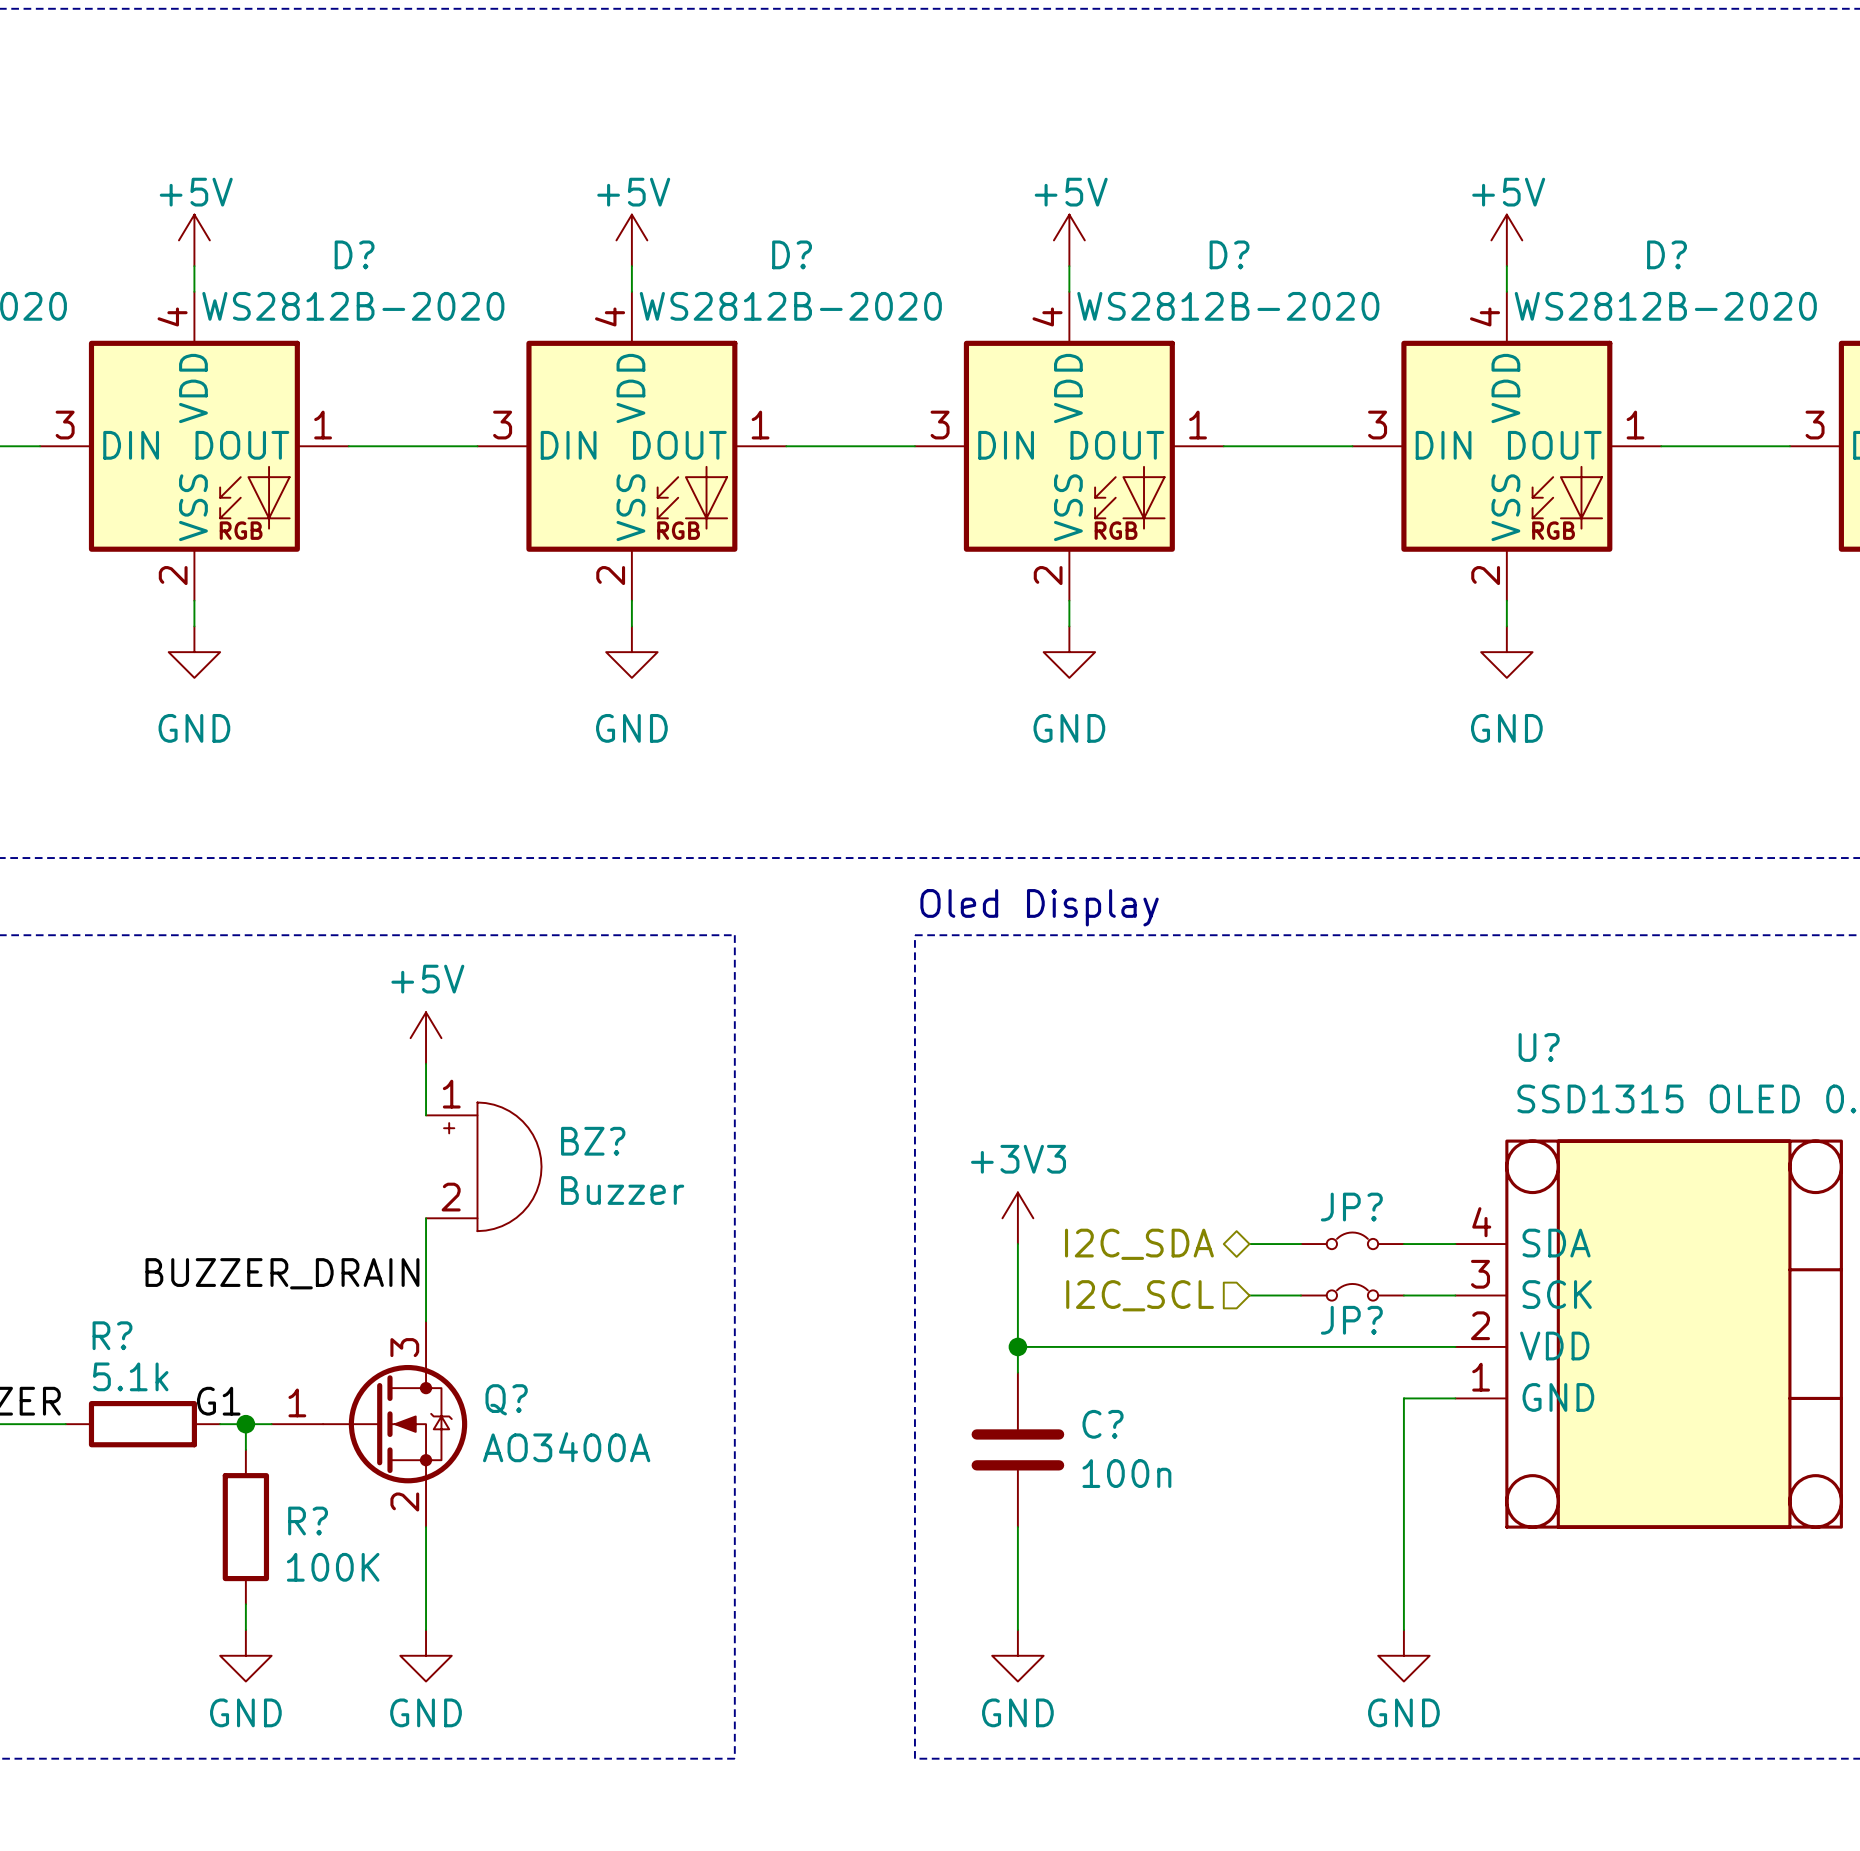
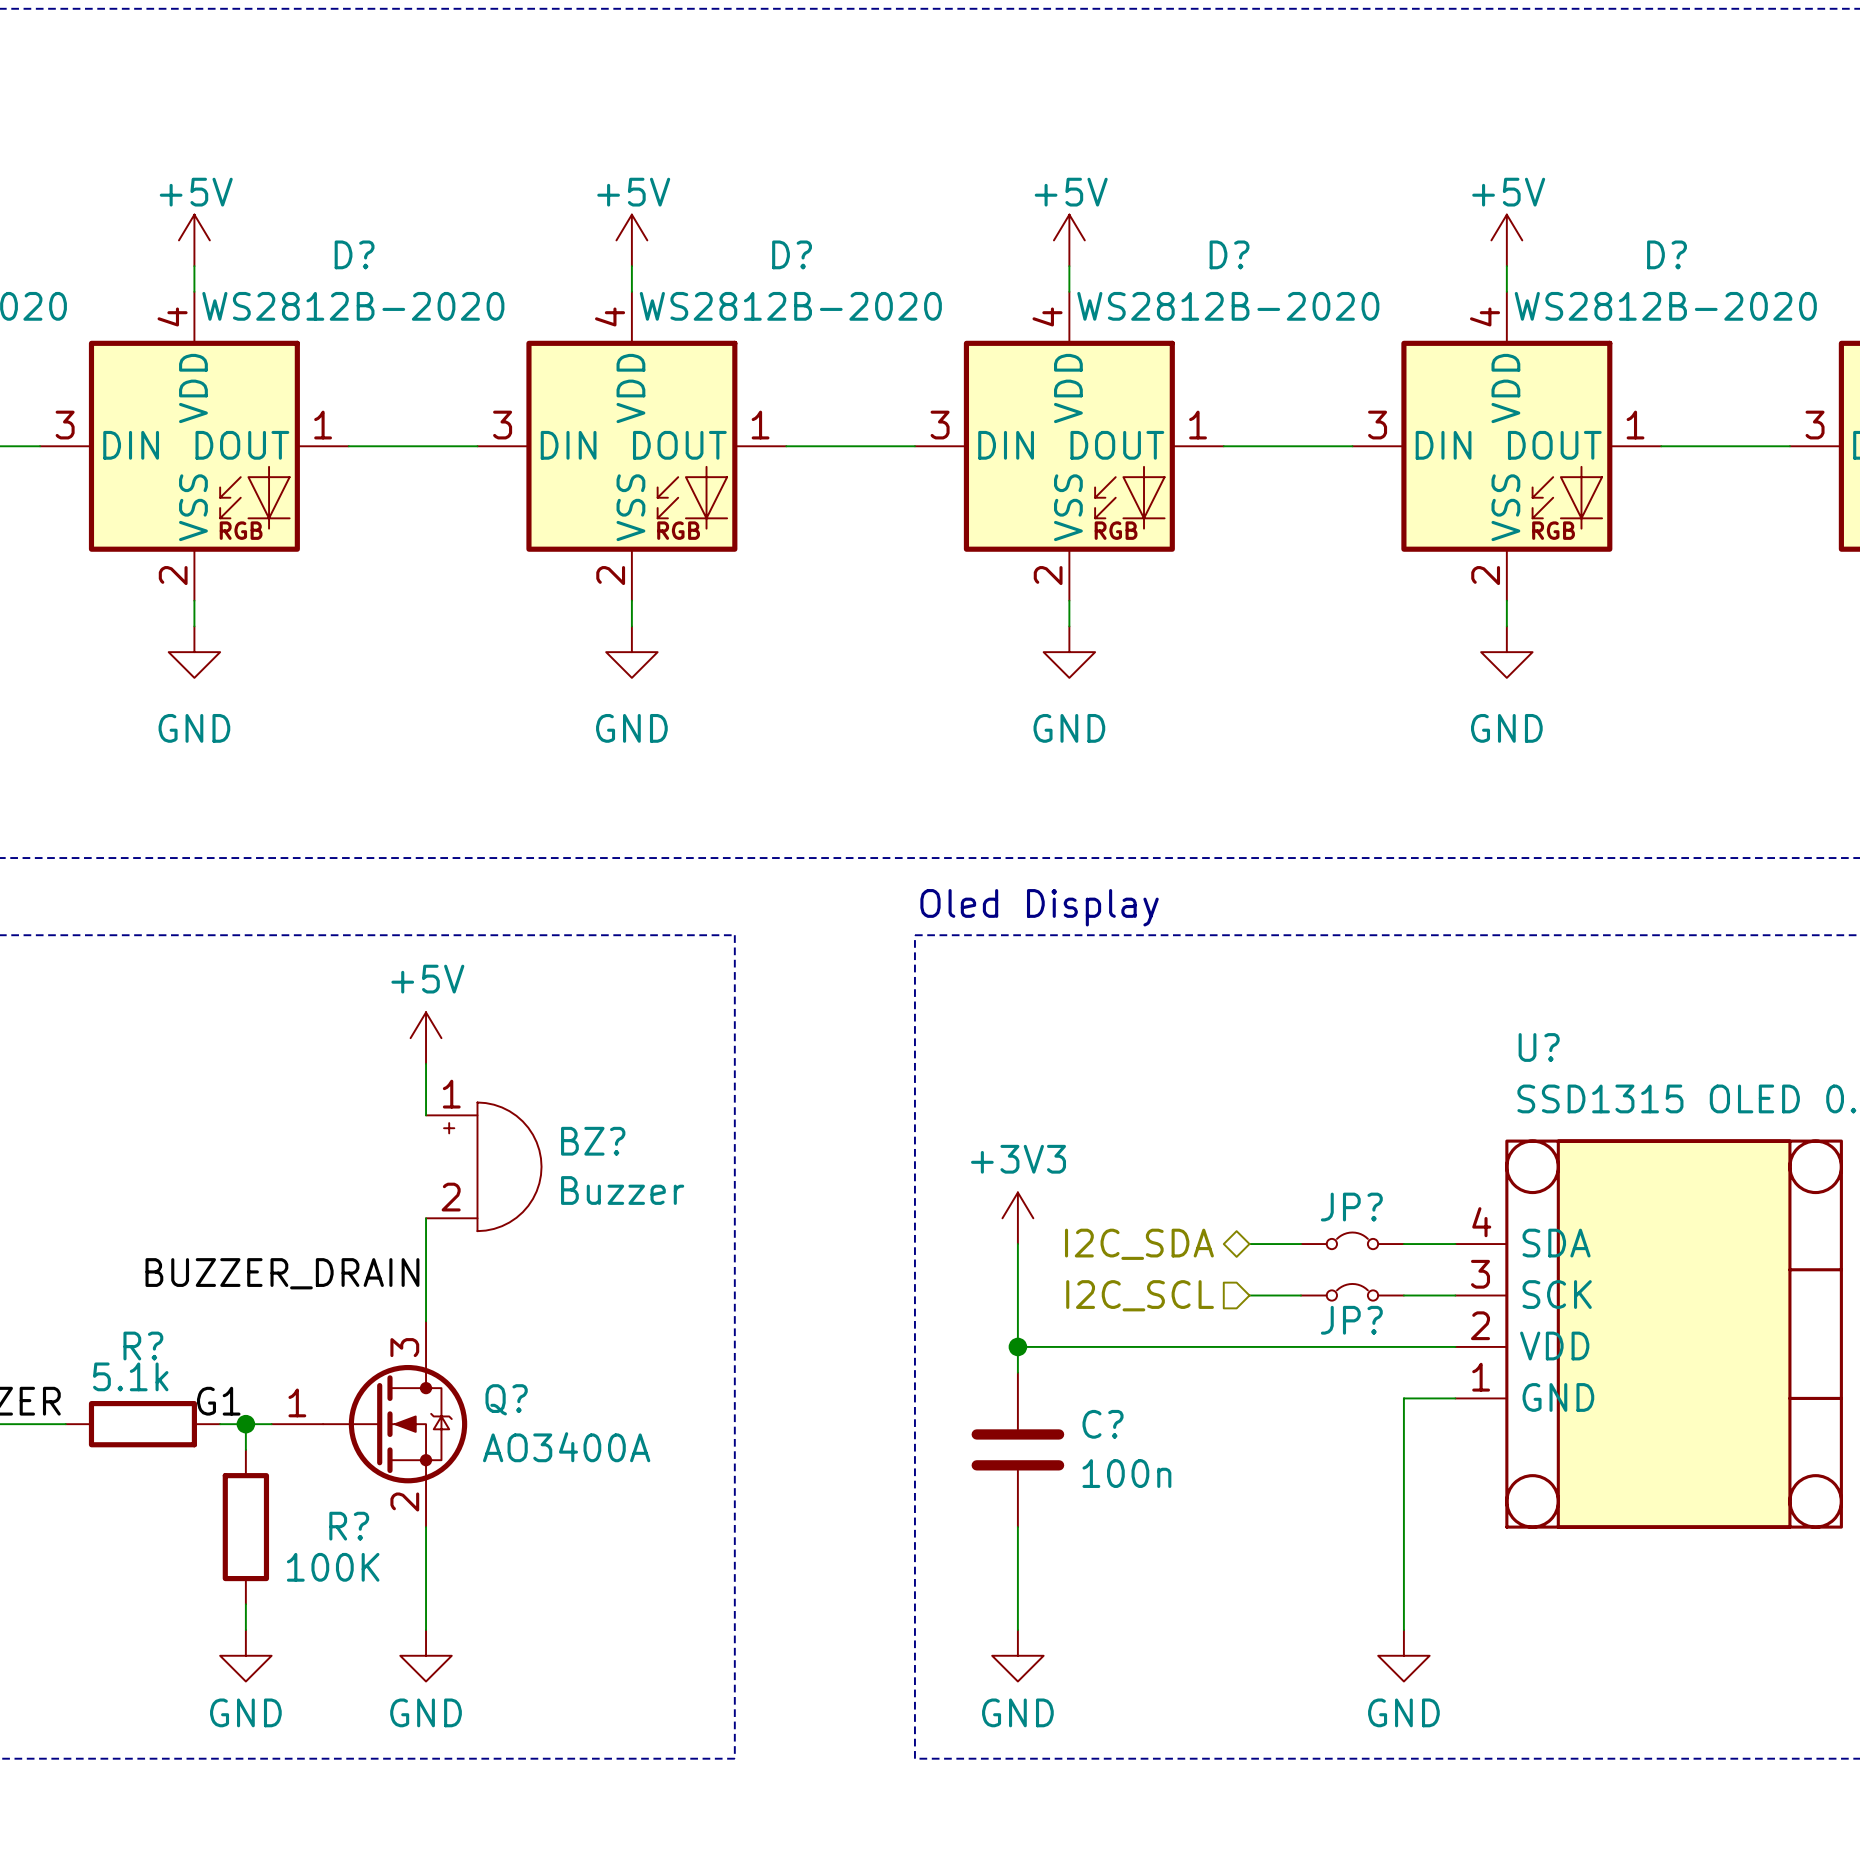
R? name position: R? (112, 1335) -> R? (143, 1346)
R? name position: R? (308, 1520) -> R? (349, 1526)

